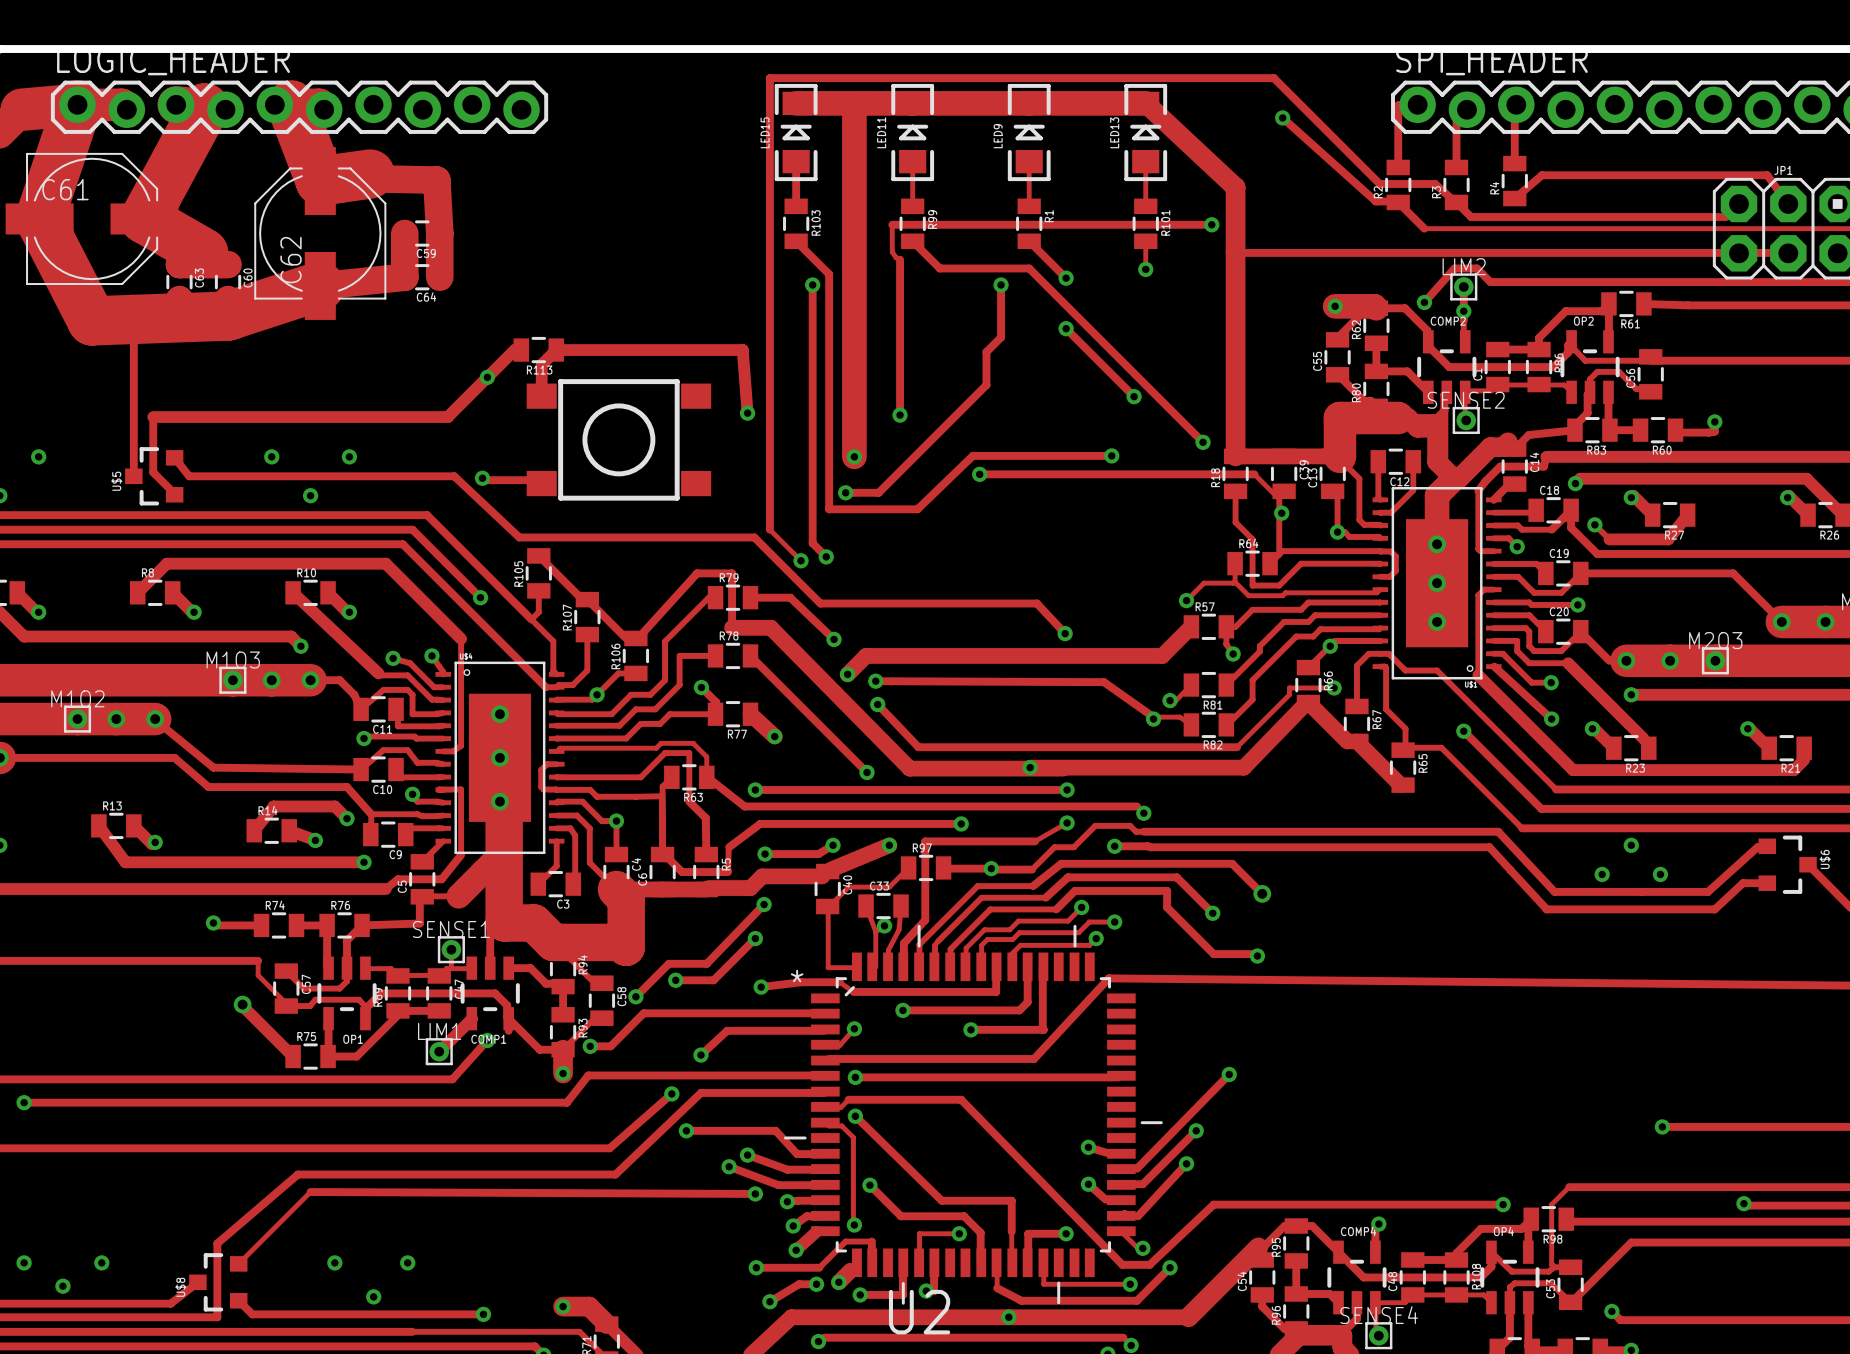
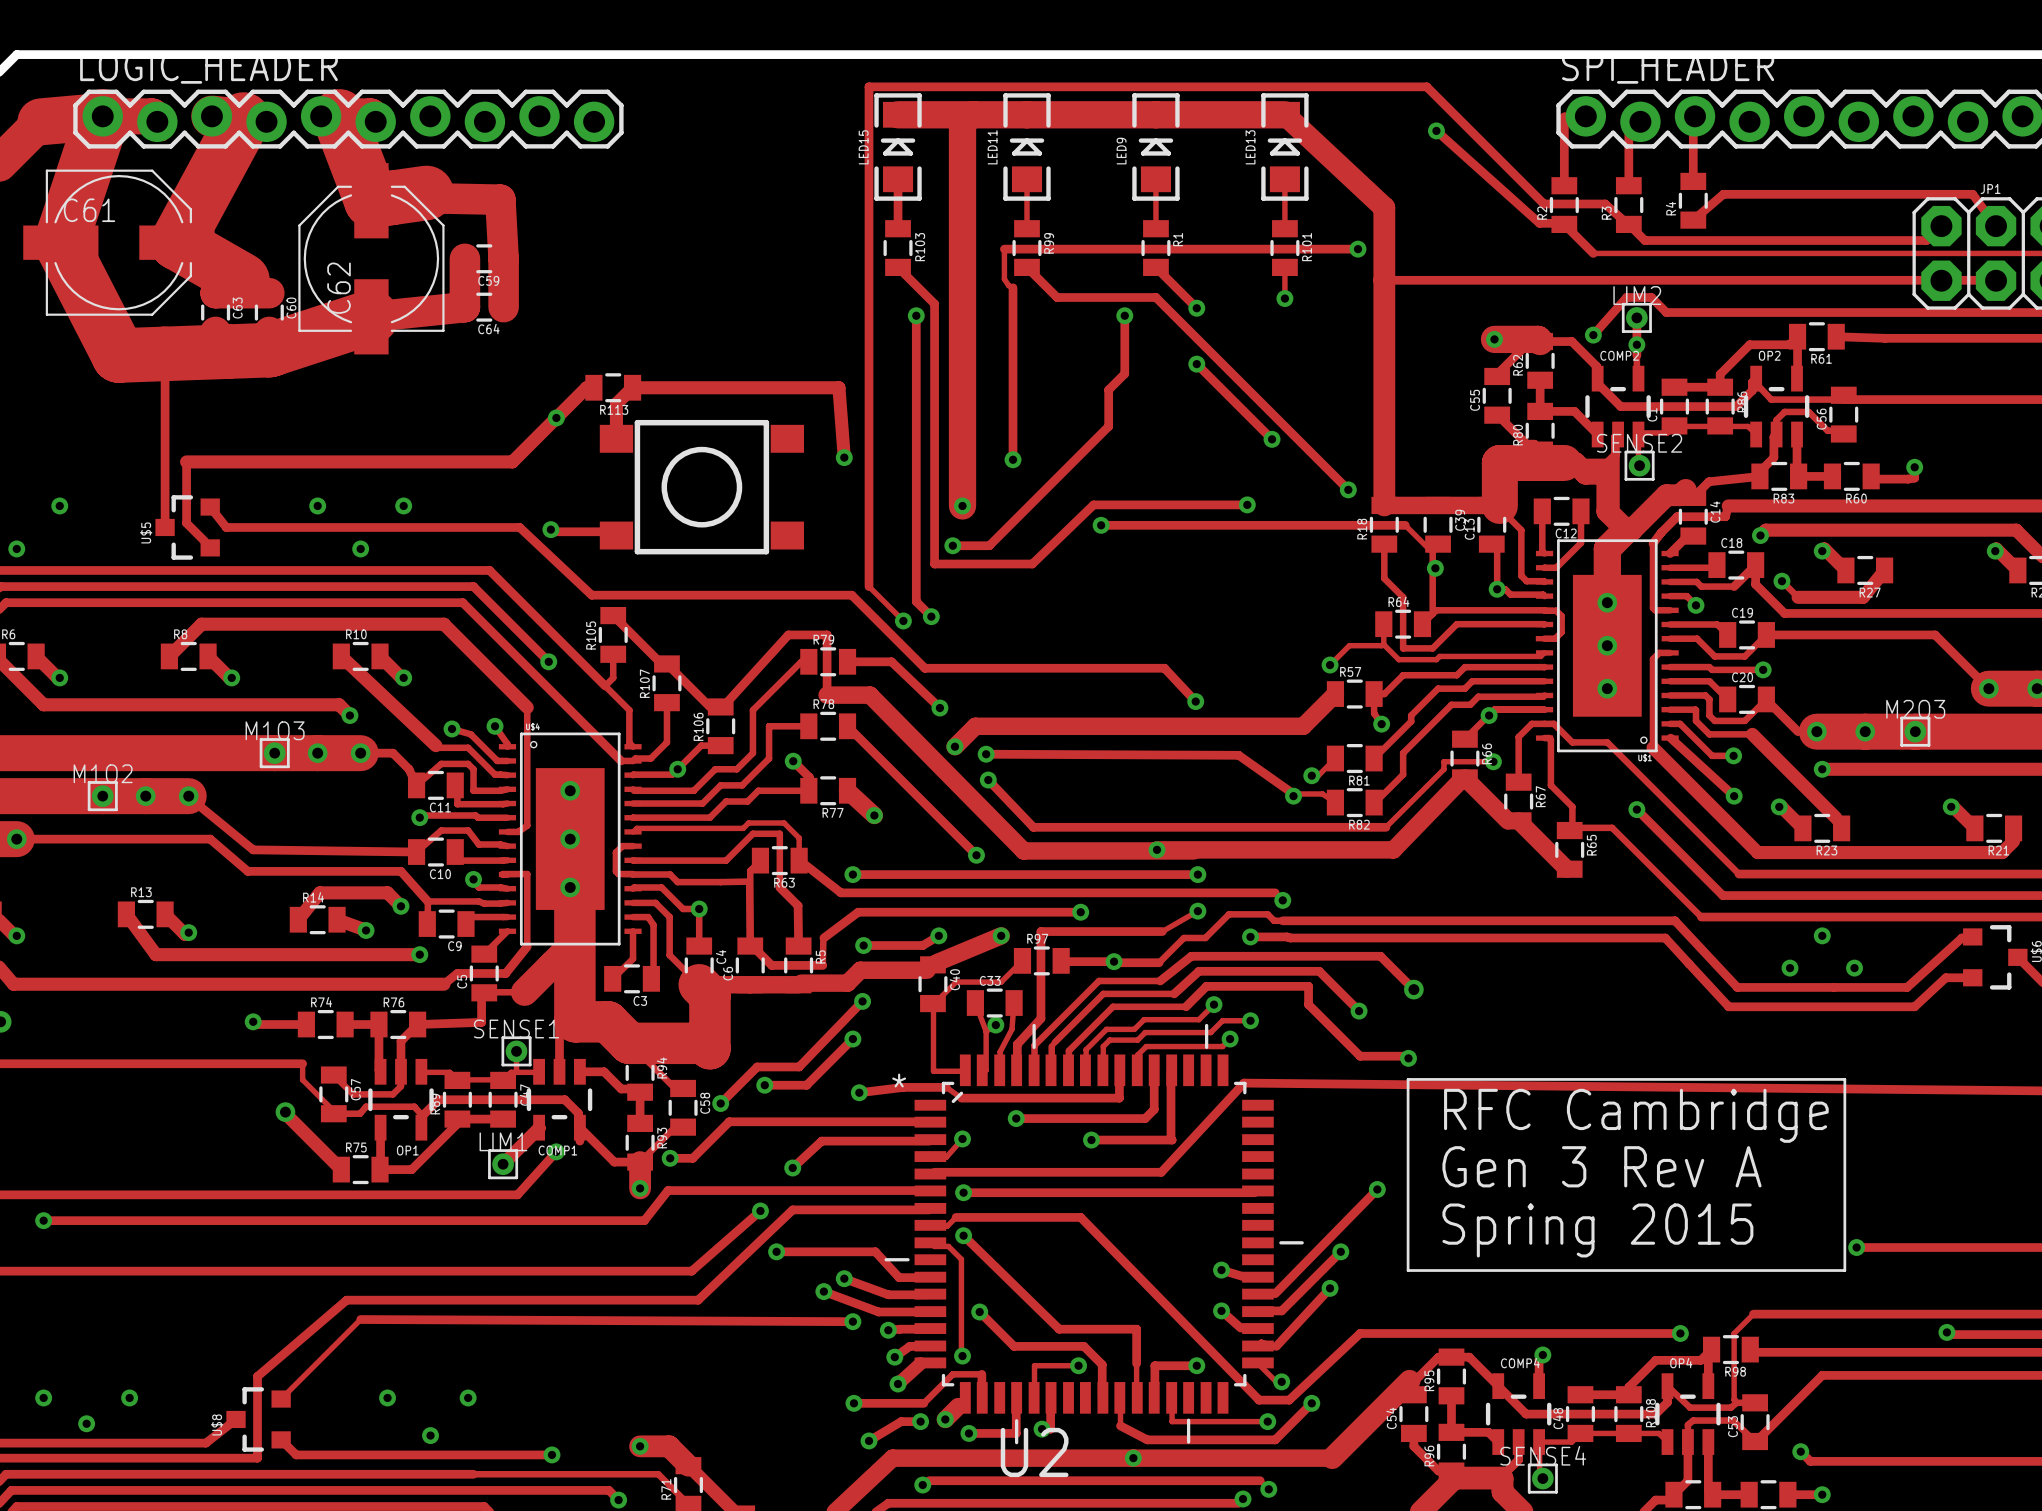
drawing: none -> [1406, 1078, 1847, 1272]

